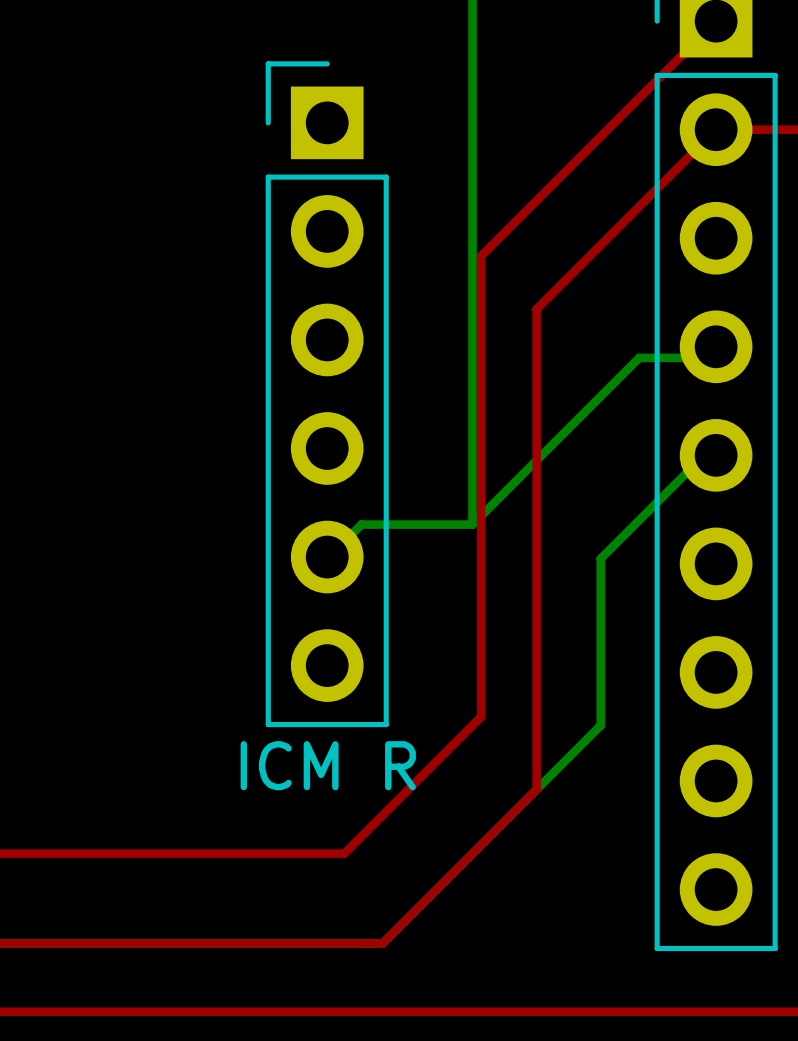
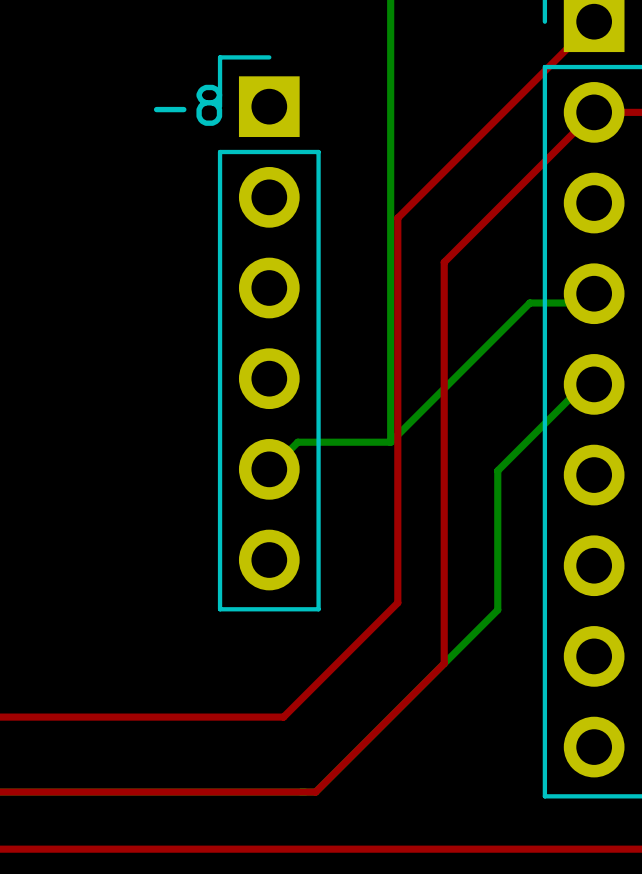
-8 name: none -> -8 (188, 105)
-8 value: ICM R (328, 765) -> none

